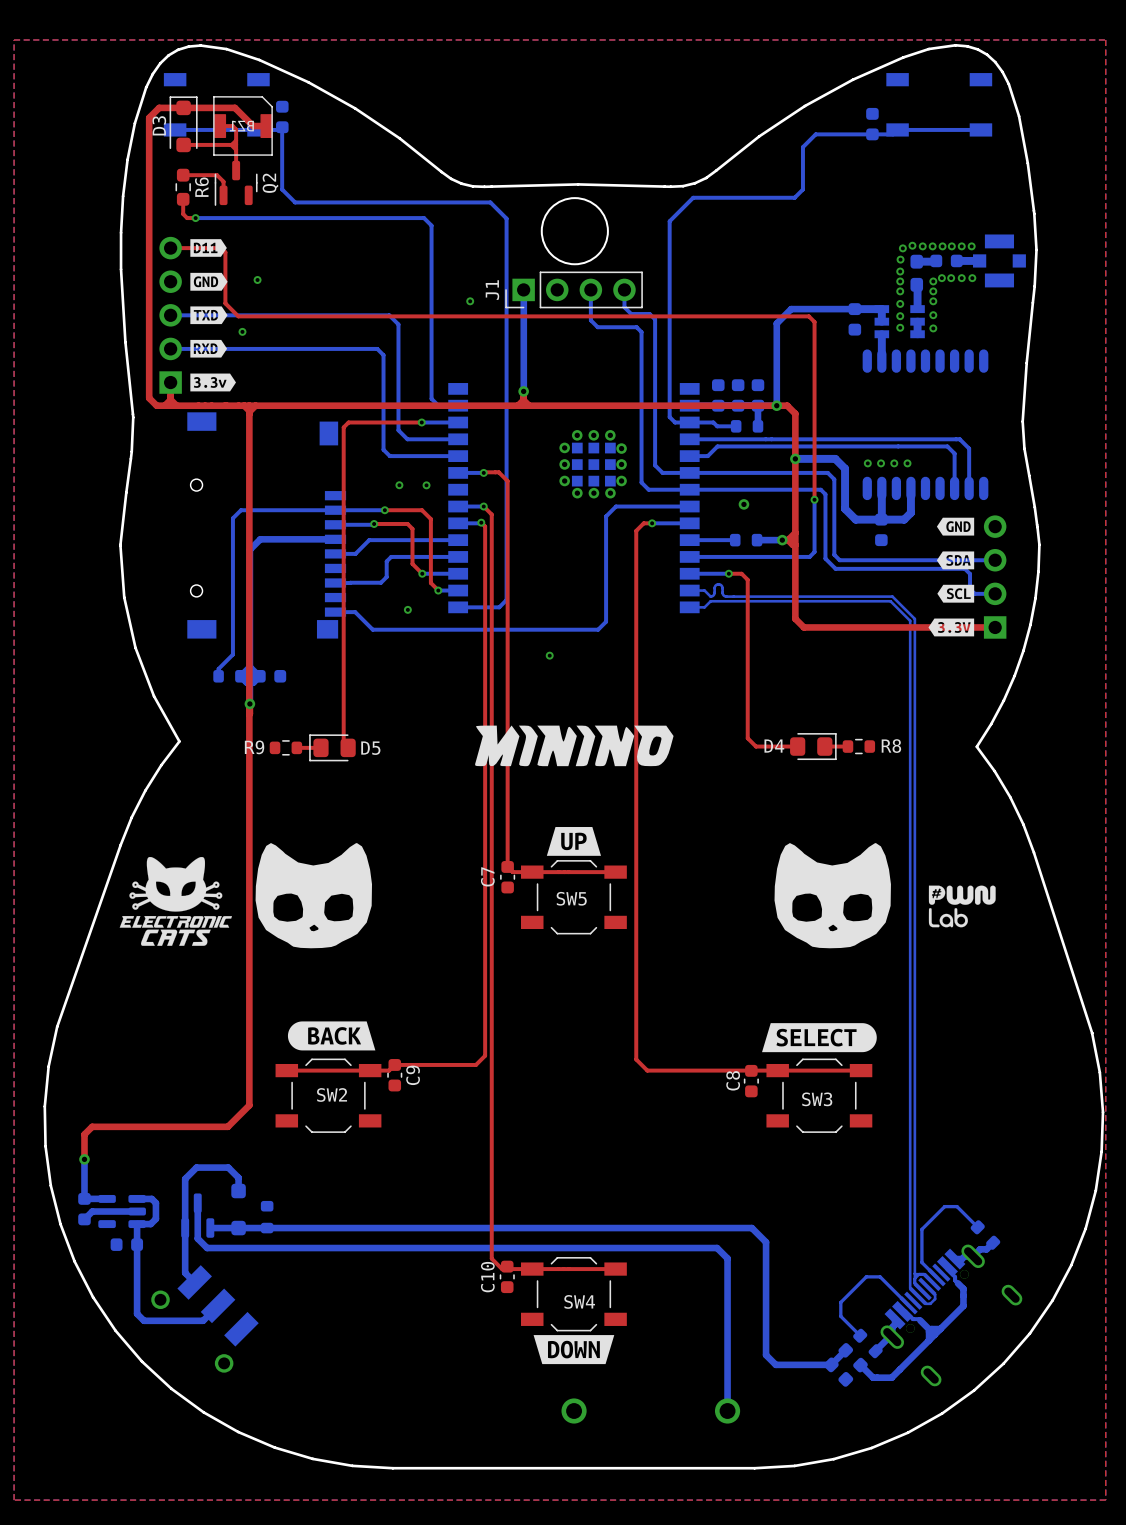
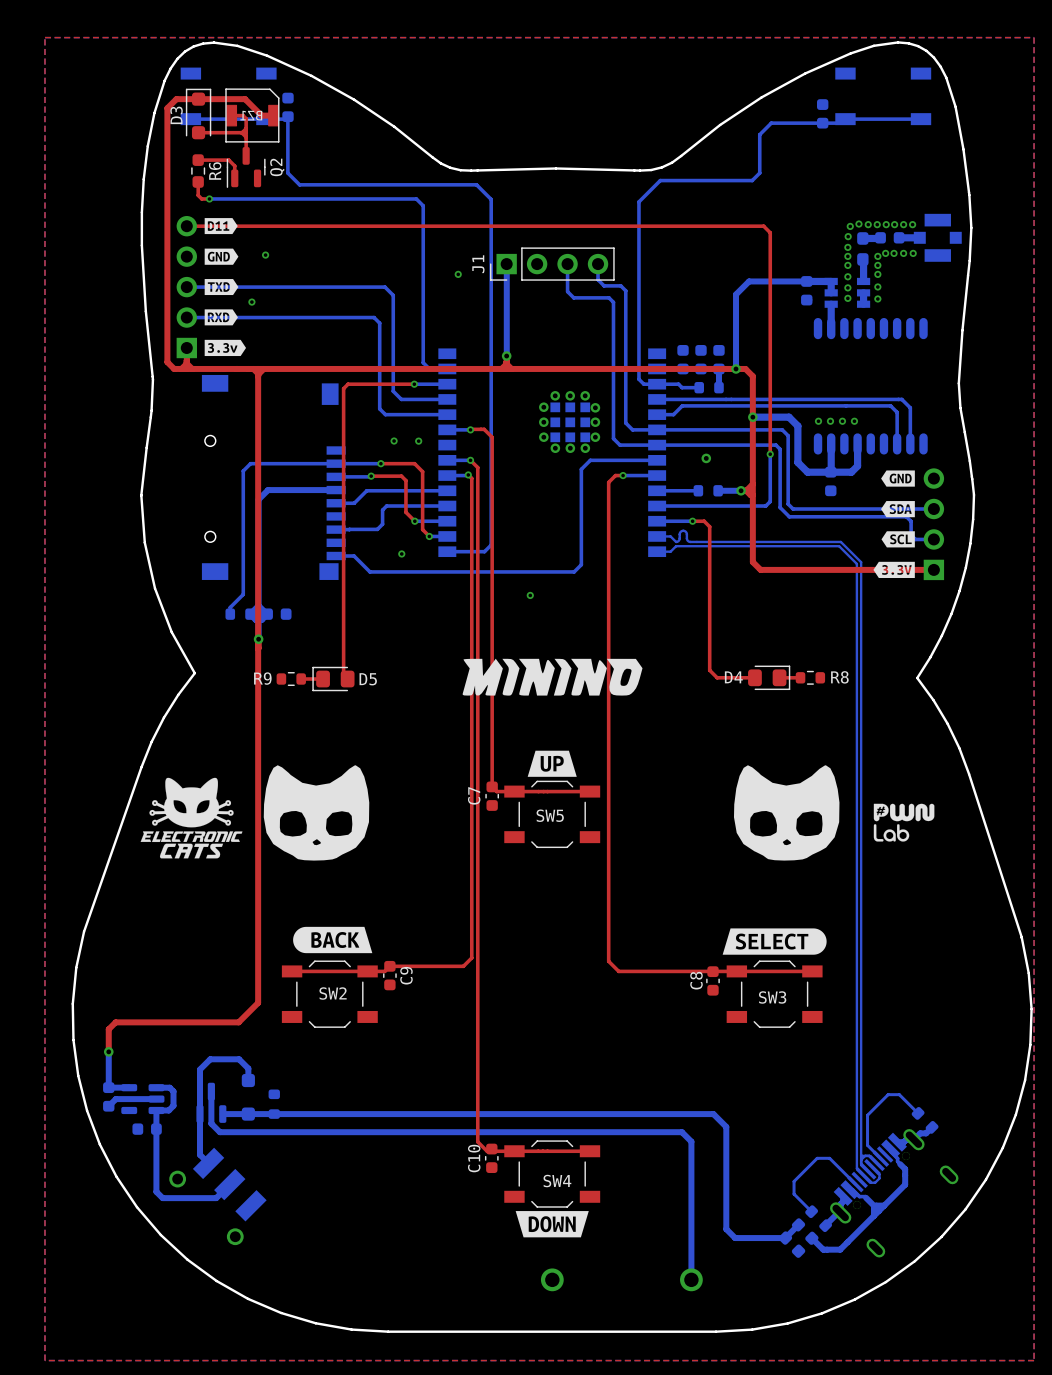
round board edge: [540, 197, 609, 266] -> none
top track: (221, 248) (225, 252) (225, 303) (238, 316) (808, 316) (814, 322) -> (232, 226) (763, 226) (770, 232) (770, 293)

